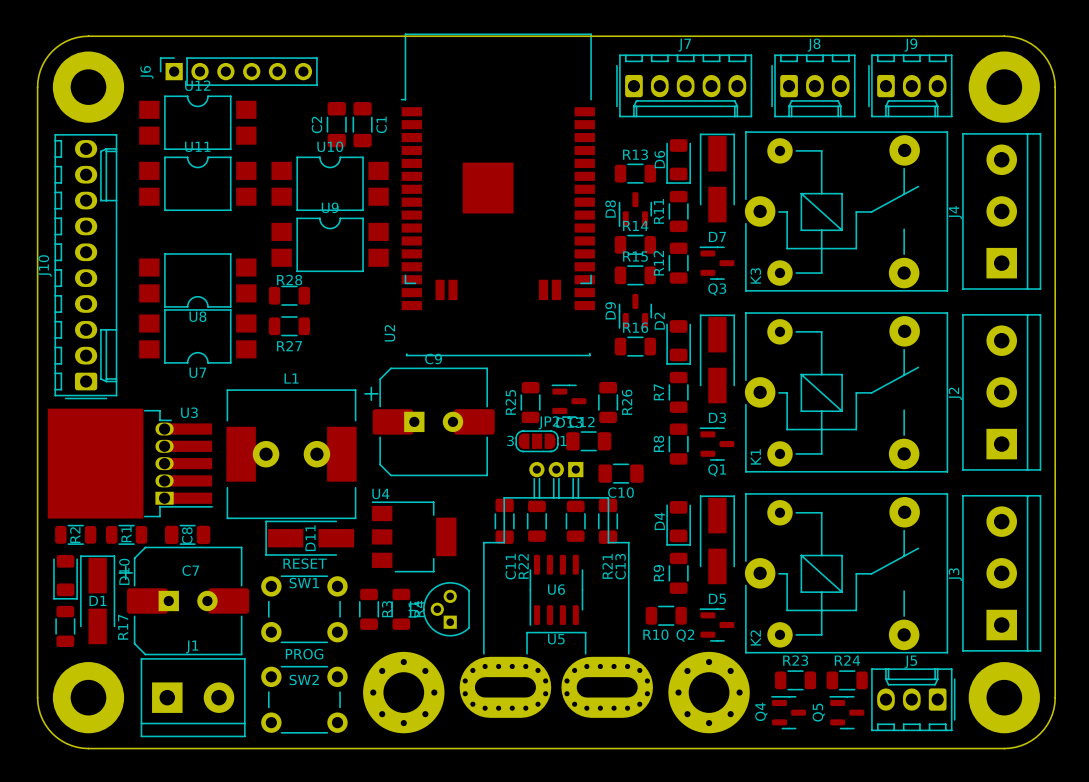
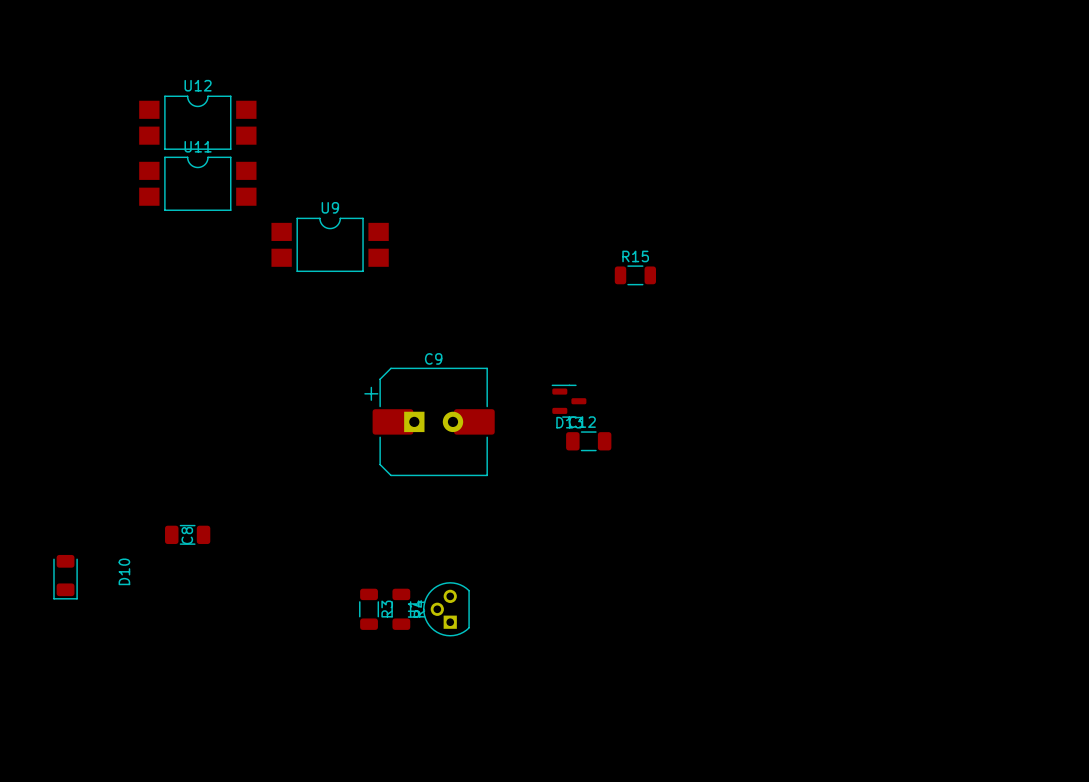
board edge: (88, 36) (1004, 36) (1021, 39) (1036, 47) (1050, 65) (1055, 87) (1055, 697) (1052, 714) (1044, 729) (1026, 743) (1004, 748) (88, 748) (71, 745) (56, 737) (42, 719) (37, 697) (37, 87) (40, 70) (52, 51) (66, 41) (88, 36) -> none
J6: (238, 71) -> none
J7: (684, 85) -> none
J8: (813, 85) -> none
J9: (910, 85) -> none
part: (88, 87) -> none
part: (1004, 87) -> none
C2: (336, 124) -> none
C1: (362, 124) -> none
D6: (678, 161) -> none
R13: (635, 173) -> none
D7: (717, 178) -> none
U10: (330, 183) -> none
U2: (497, 194) -> none
D8: (635, 209) -> none
R11: (678, 211) -> none
K3: (846, 211) -> none
J4: (1001, 211) -> none
R14: (635, 244) -> none
R12: (678, 263) -> none
Q3: (717, 263) -> none
J10: (85, 266) -> none
U8: (197, 280) -> none
R28: (289, 295) -> none
D9: (635, 311) -> none
R27: (289, 326) -> none
U7: (197, 336) -> none
D2: (678, 342) -> none
R16: (635, 346) -> none
D3: (717, 359) -> none
R7: (678, 392) -> none
K1: (846, 392) -> none
J2: (1001, 392) -> none
R25: (530, 402) -> none
R26: (608, 402) -> none
JP2: (537, 441) -> none
R8: (678, 444) -> none
Q1: (717, 444) -> none
L1: (291, 454) -> none
U3: (130, 463) -> none
C10: (621, 473) -> none
C11: (504, 521) -> none
R22: (536, 521) -> none
R21: (575, 521) -> none
C13: (608, 521) -> none
D4: (678, 523) -> none
R2: (75, 534) -> none
R1: (126, 534) -> none
U4: (414, 536) -> none
D11: (309, 538) -> none
D5: (717, 539) -> none
text: RESET (305, 563) -> none
R9: (678, 573) -> none
K2: (846, 573) -> none
J3: (1001, 573) -> none
U5: (556, 589) -> none
U6: (556, 590) -> none
D1: (97, 599) -> none
C7: (183, 601) -> none
SW1: (304, 609) -> none
R10: (666, 615) -> none
Q2: (717, 625) -> none
R17: (65, 626) -> none
text: PROG (304, 654) -> none
R23: (795, 680) -> none
R24: (847, 680) -> none
part: (403, 692) -> none
part: (709, 692) -> none
part: (88, 697) -> none
J1: (193, 697) -> none
part: (1004, 697) -> none
SW2: (304, 699) -> none
J5: (913, 699) -> none
Q4: (788, 712) -> none
Q5: (846, 712) -> none

